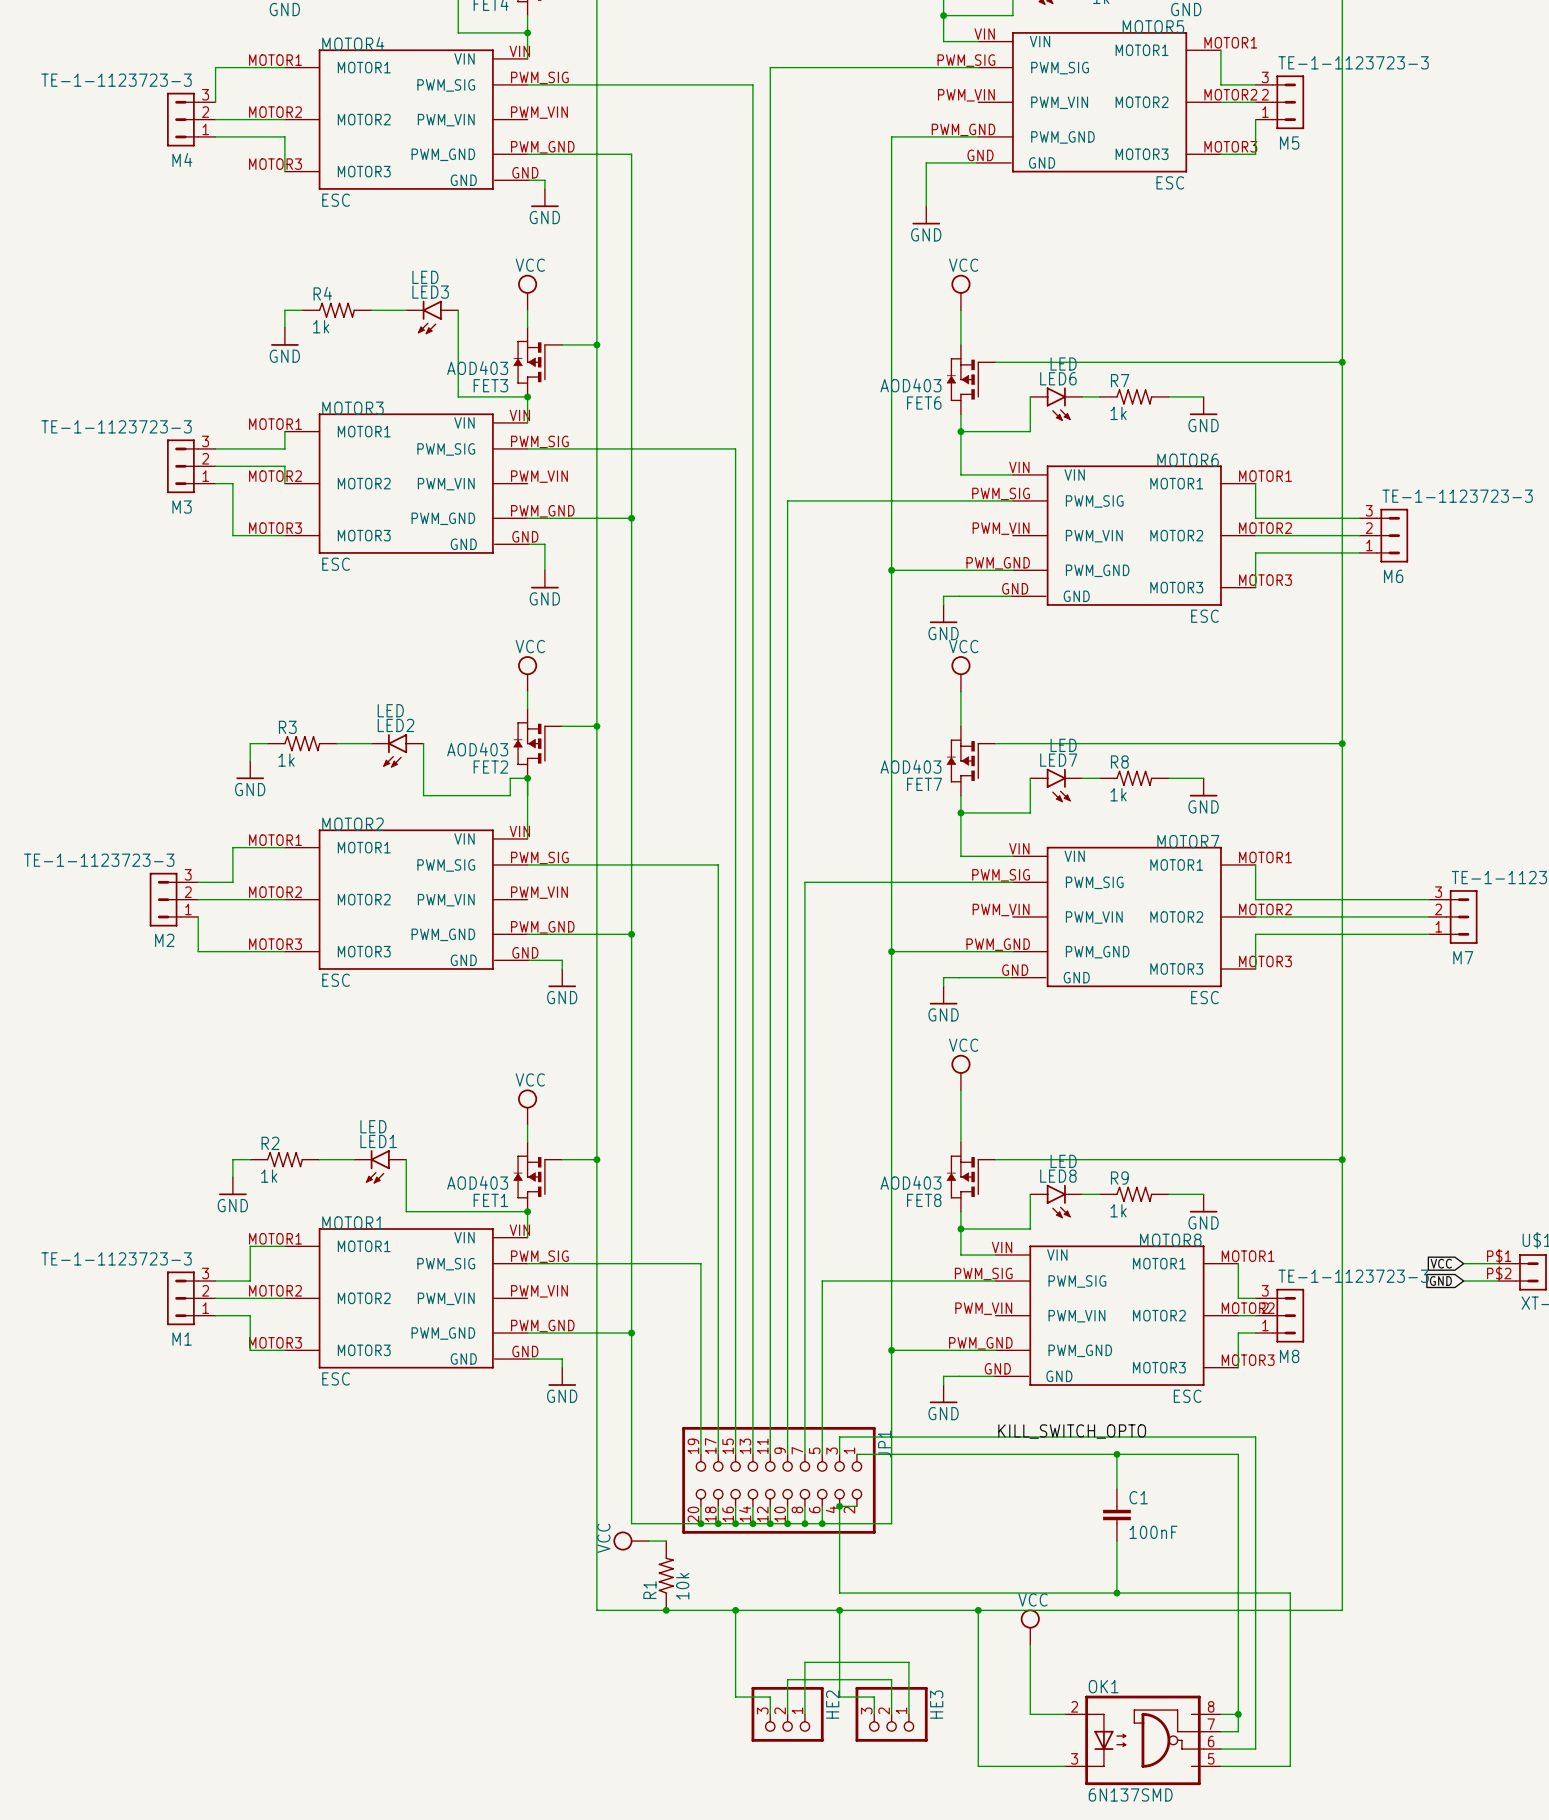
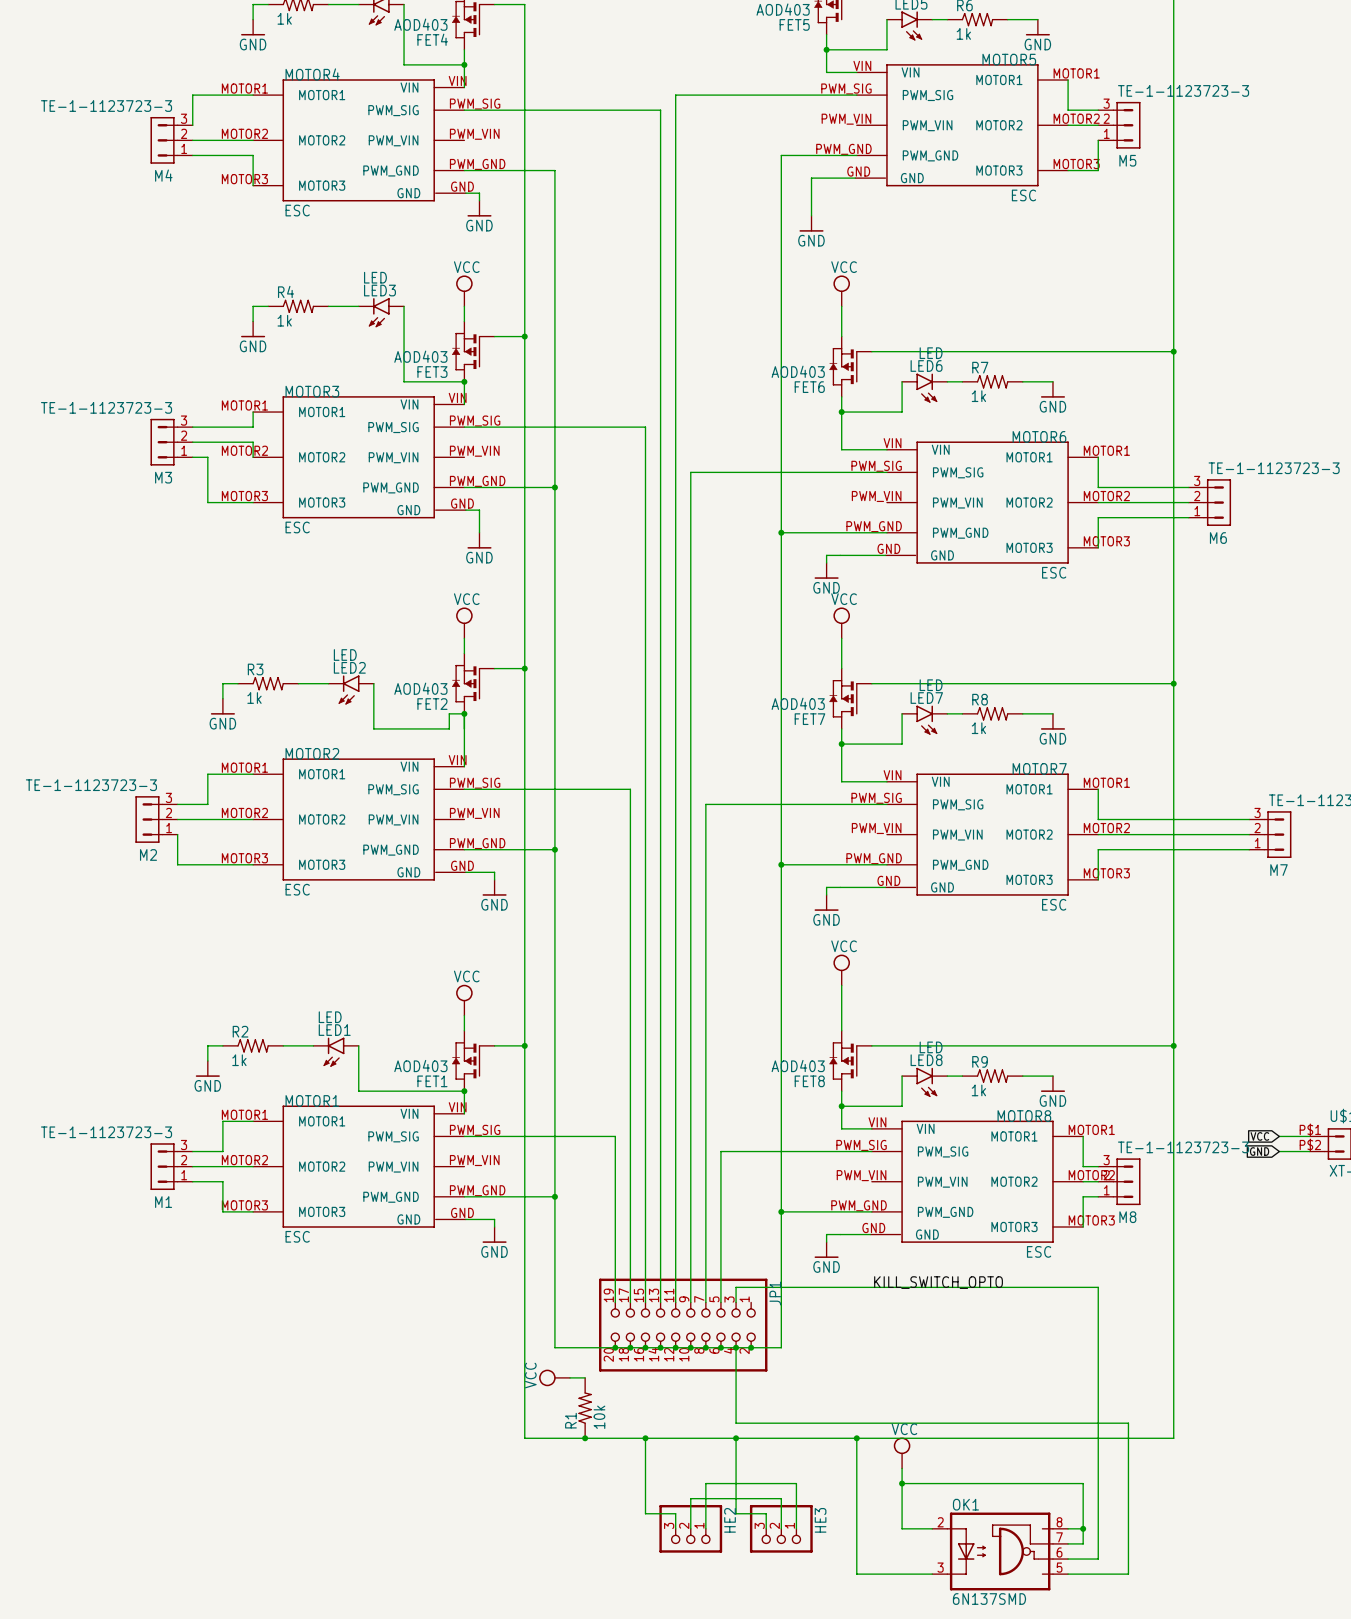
wire: (856, 1454) (1238, 1454) (1238, 1662) -> (902, 1483) (1083, 1483)
wire: (1116, 1454) (1116, 1489) -> none
junction: (1116, 1454) -> none
wire: (631, 1506) (631, 1523) (891, 1523) (891, 1506) -> (554, 1347) (736, 1347)
wire: (700, 1506) (700, 1523) -> none
junction: none -> (615, 1347)
wire: (718, 1506) (718, 1523) -> none
junction: none -> (630, 1347)
wire: (735, 1506) (735, 1523) -> none
junction: none -> (645, 1347)
wire: (752, 1506) (752, 1523) -> none
junction: none -> (660, 1347)
wire: (770, 1506) (770, 1523) -> none
junction: none -> (675, 1347)
wire: (787, 1506) (787, 1523) -> none
junction: none -> (690, 1347)
wire: (804, 1506) (804, 1523) -> none
junction: none -> (705, 1347)
wire: (822, 1506) (822, 1523) -> none
junction: none -> (720, 1347)
wire: none -> (751, 1347) (781, 1347)
junction: none -> (751, 1347)
C1: 100nF (1116, 1515) -> none
junction: (700, 1523) -> none
junction: (718, 1523) -> none
junction: (735, 1523) -> none
junction: (752, 1523) -> none
junction: (770, 1523) -> none
junction: (787, 1523) -> none
junction: (804, 1523) -> none
junction: (822, 1523) -> none
wire: (1116, 1541) (1116, 1593) -> none
junction: (1116, 1593) -> none
junction: none -> (902, 1483)

